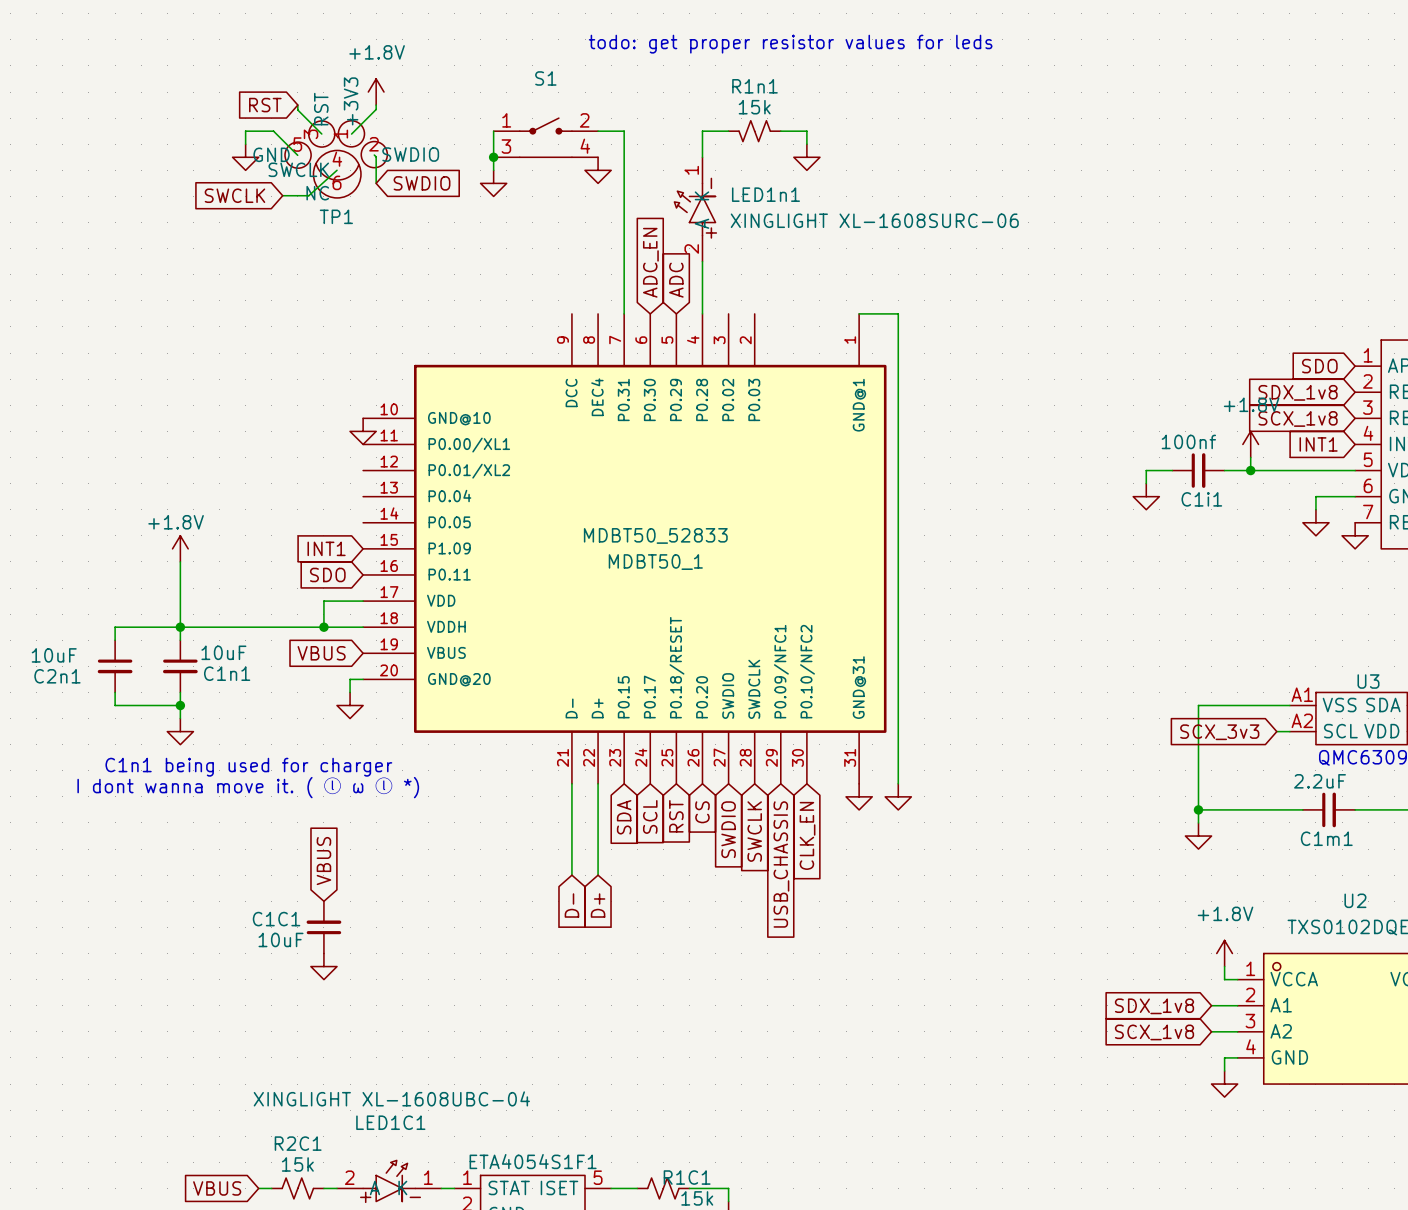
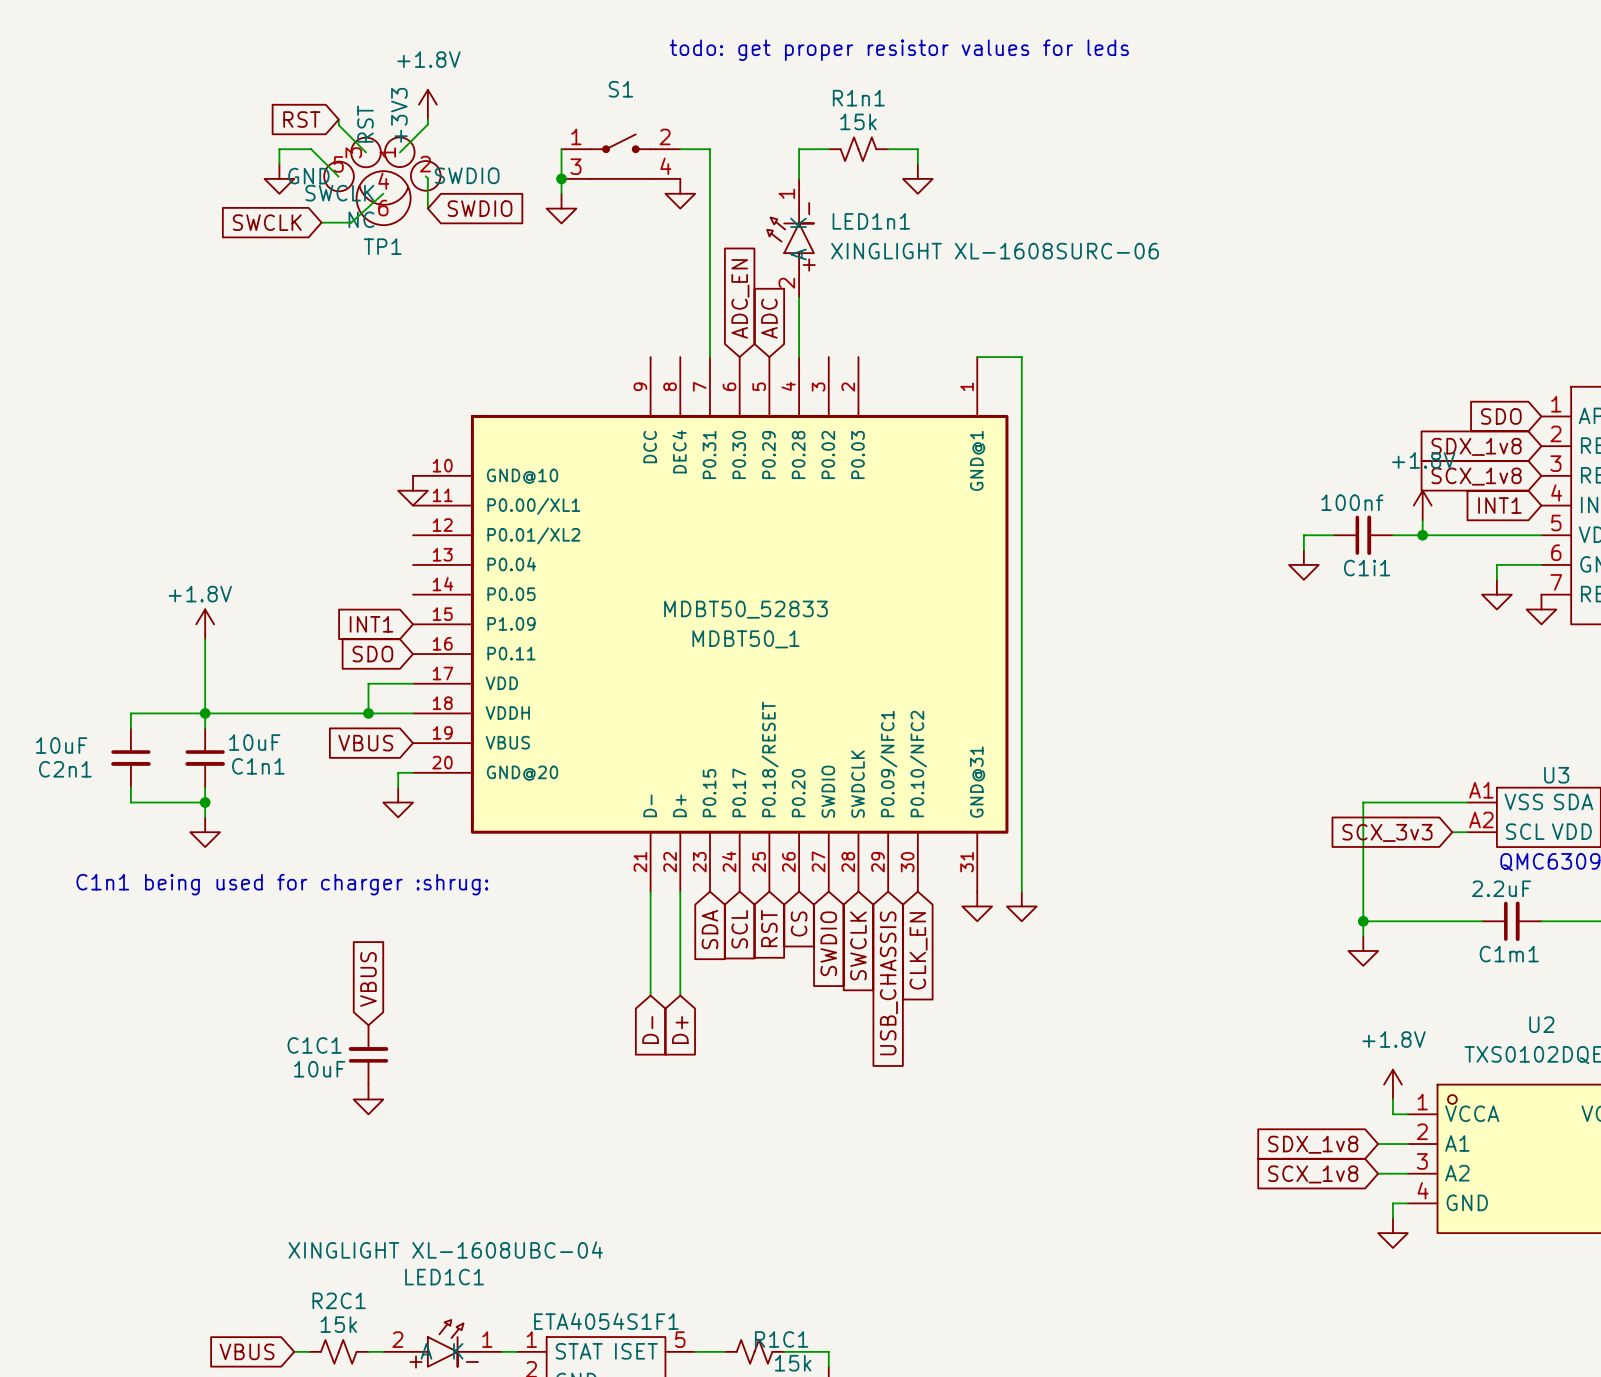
text: C1n1 being used for charger (248, 767) -> C1n1 being used for charger :shrug: (282, 884)
text: I dont wanna move it. ( ⓛ ω ⓛ *) (248, 787) -> none

